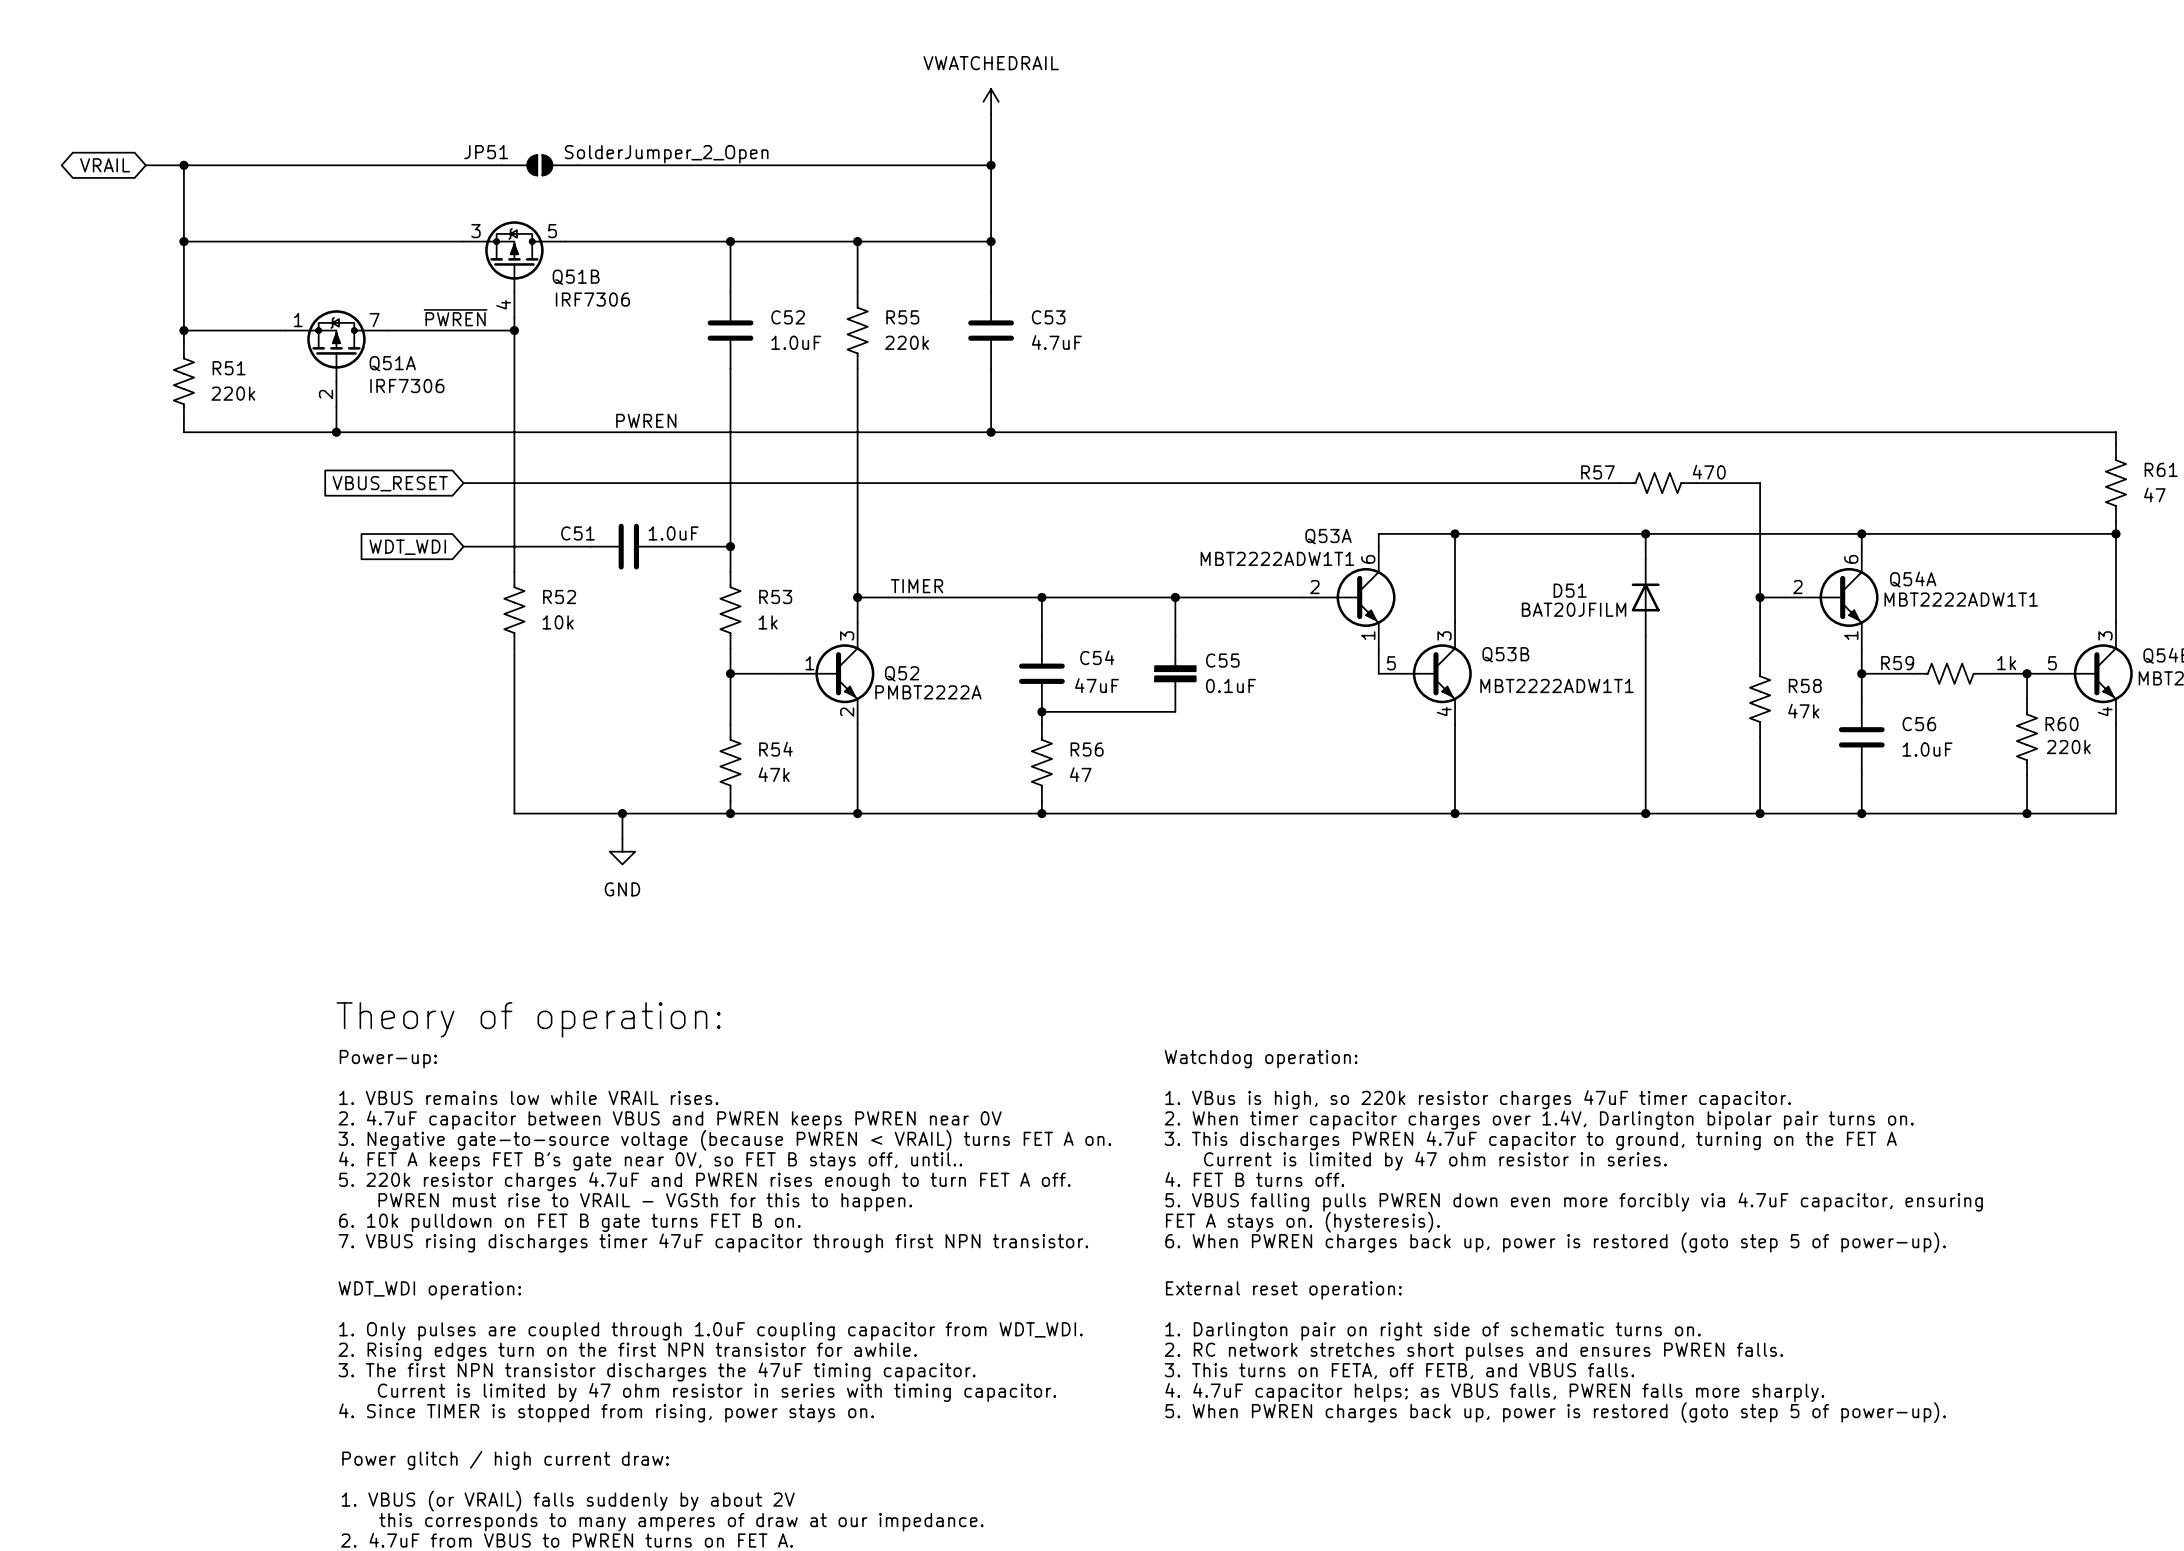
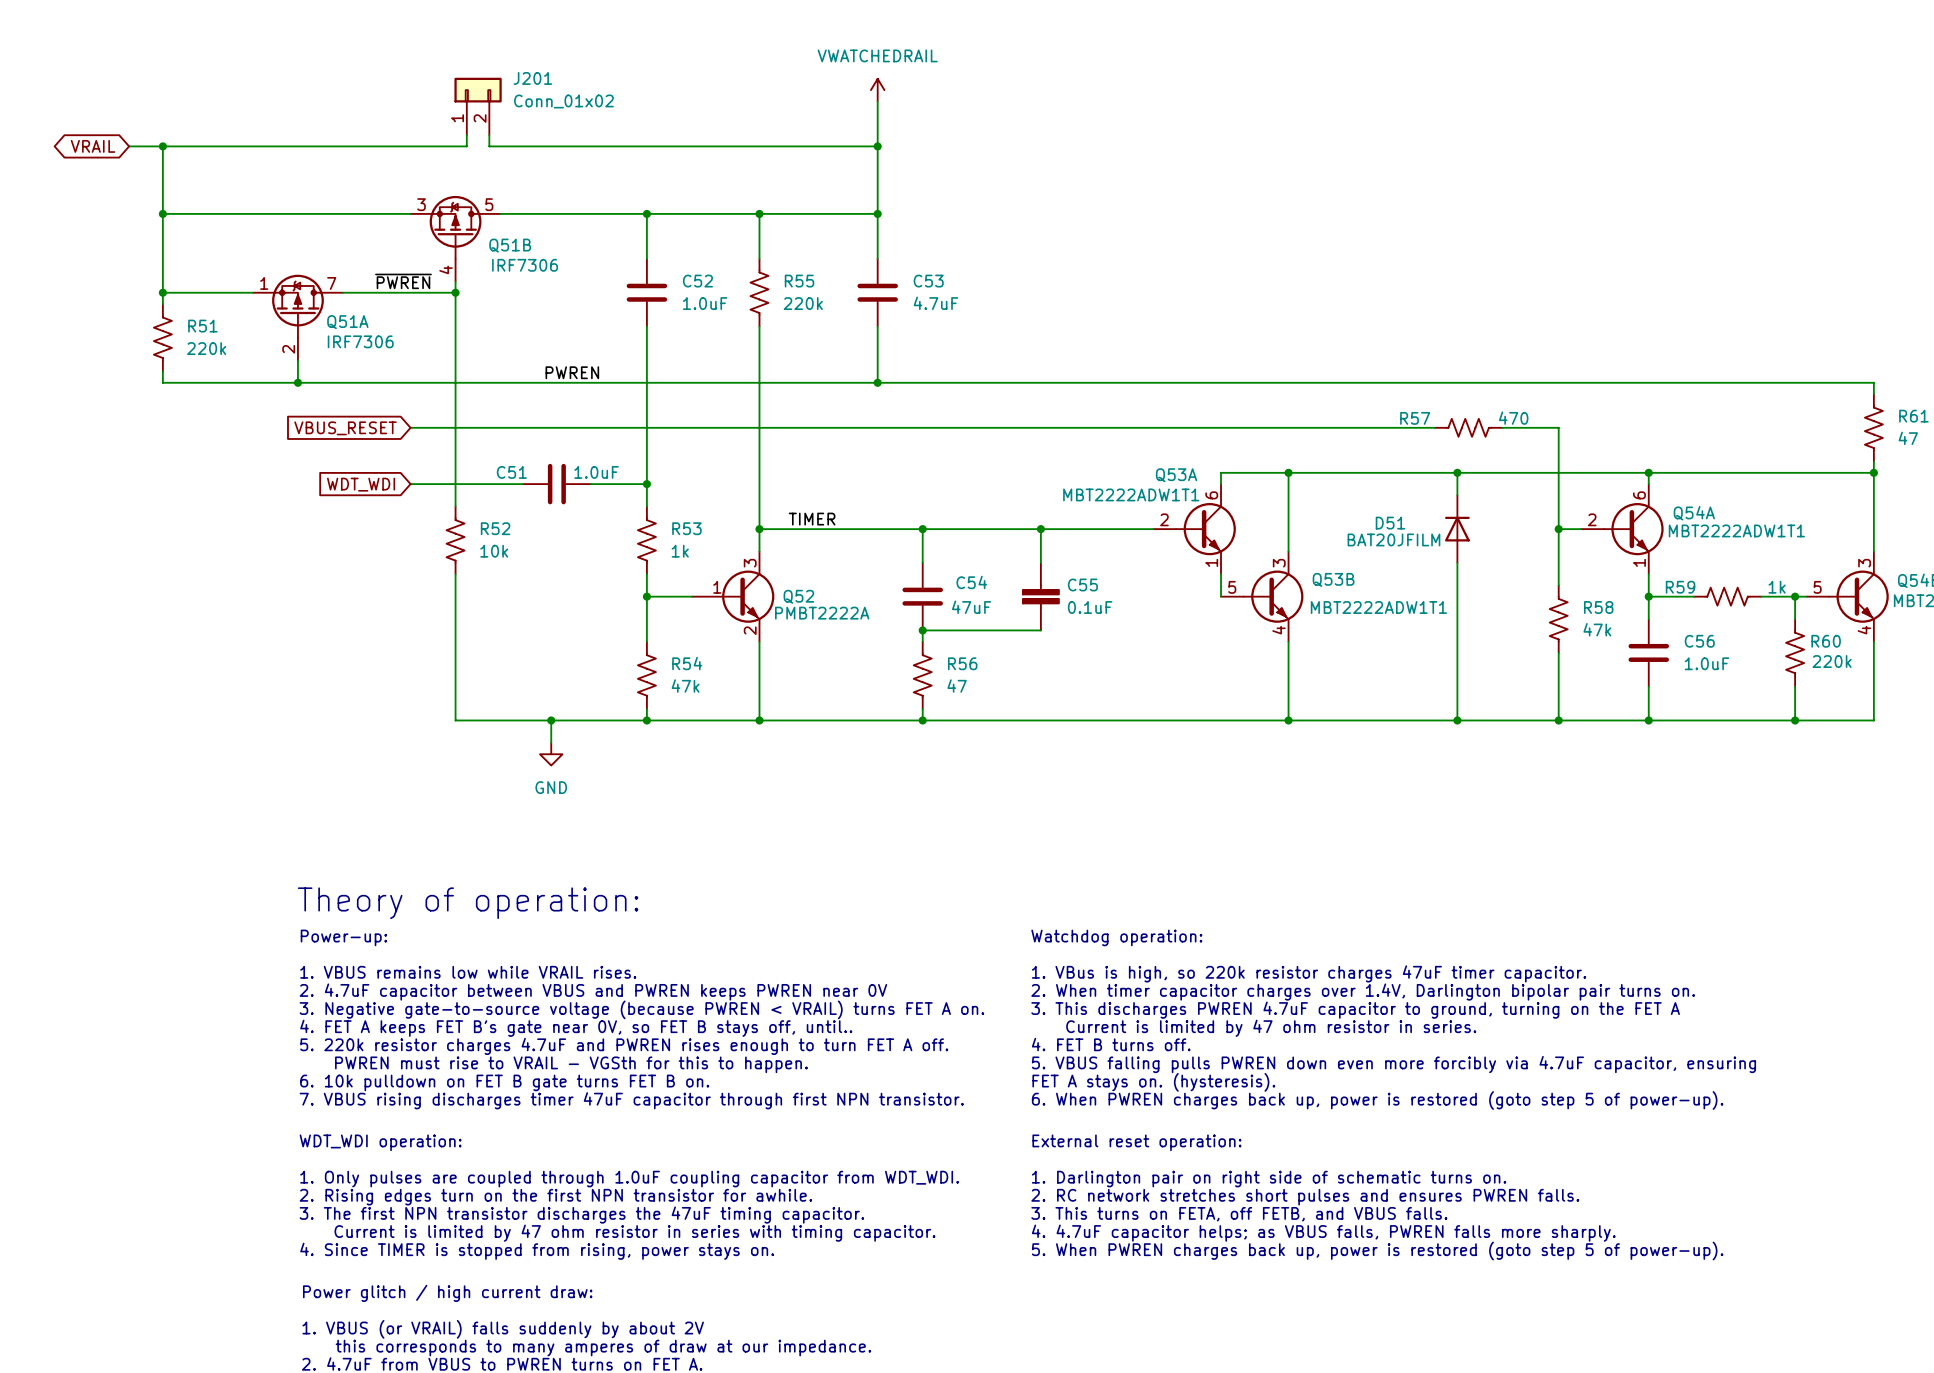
J201: none -> Conn_01x02 (478, 106)
JP51: SolderJumper_2_Open (539, 165) -> none

